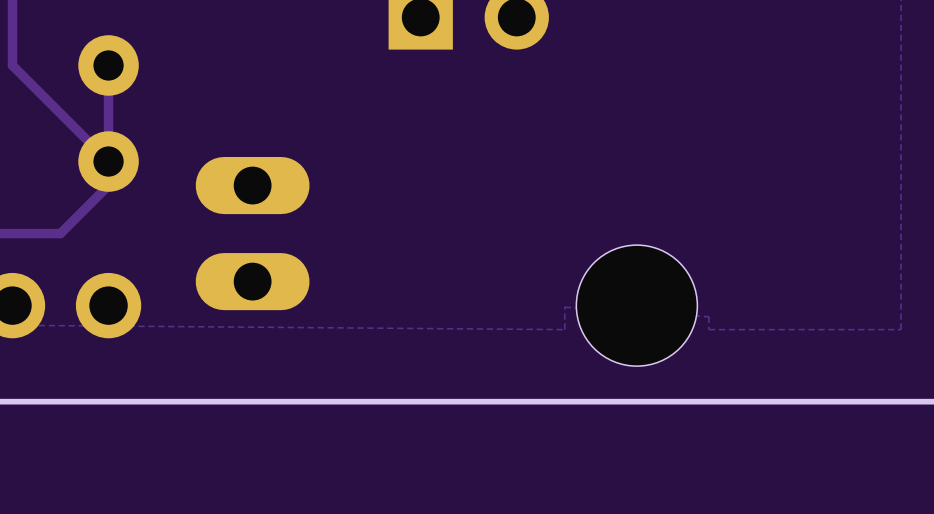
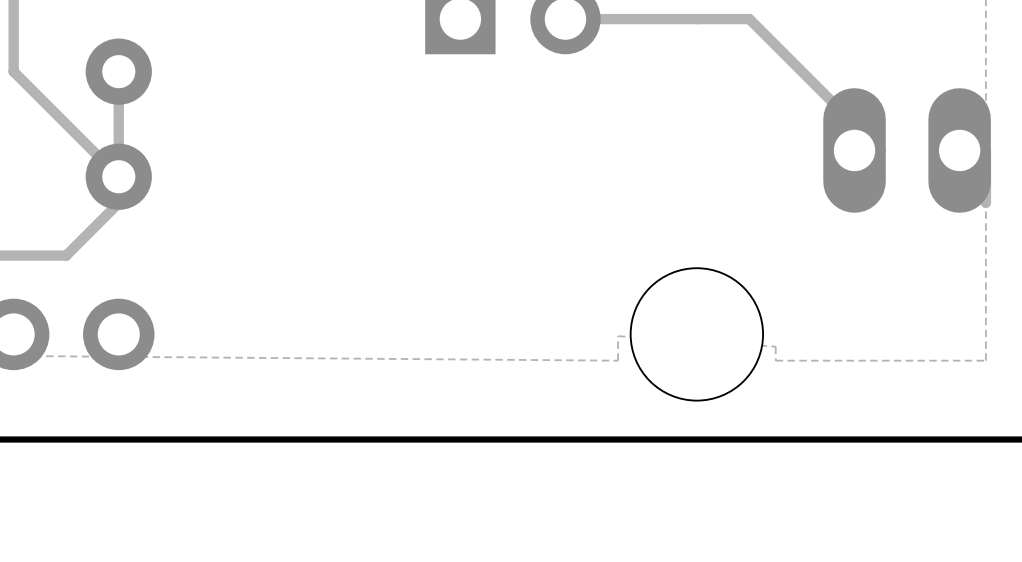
track: none -> (565, 19) (749, 19) (880, 150)
track: none -> (985, 150) (985, 203)
part rotation: 0° (252, 233) -> 90° clockwise (907, 150)
part position: (252, 233) -> (907, 150)

